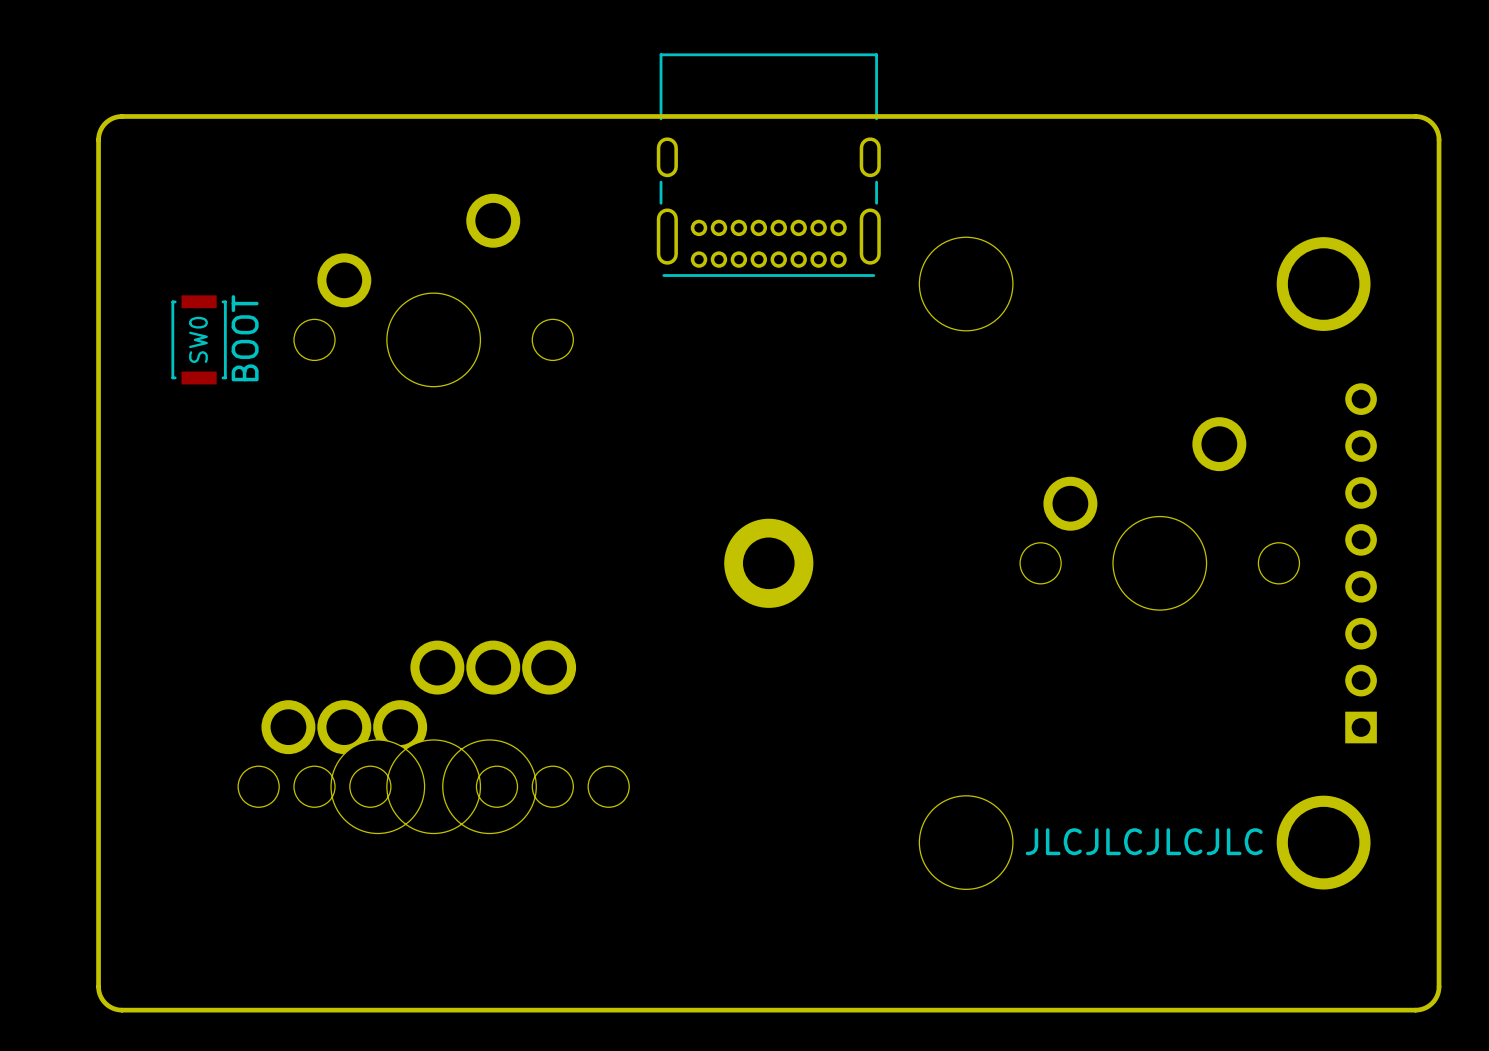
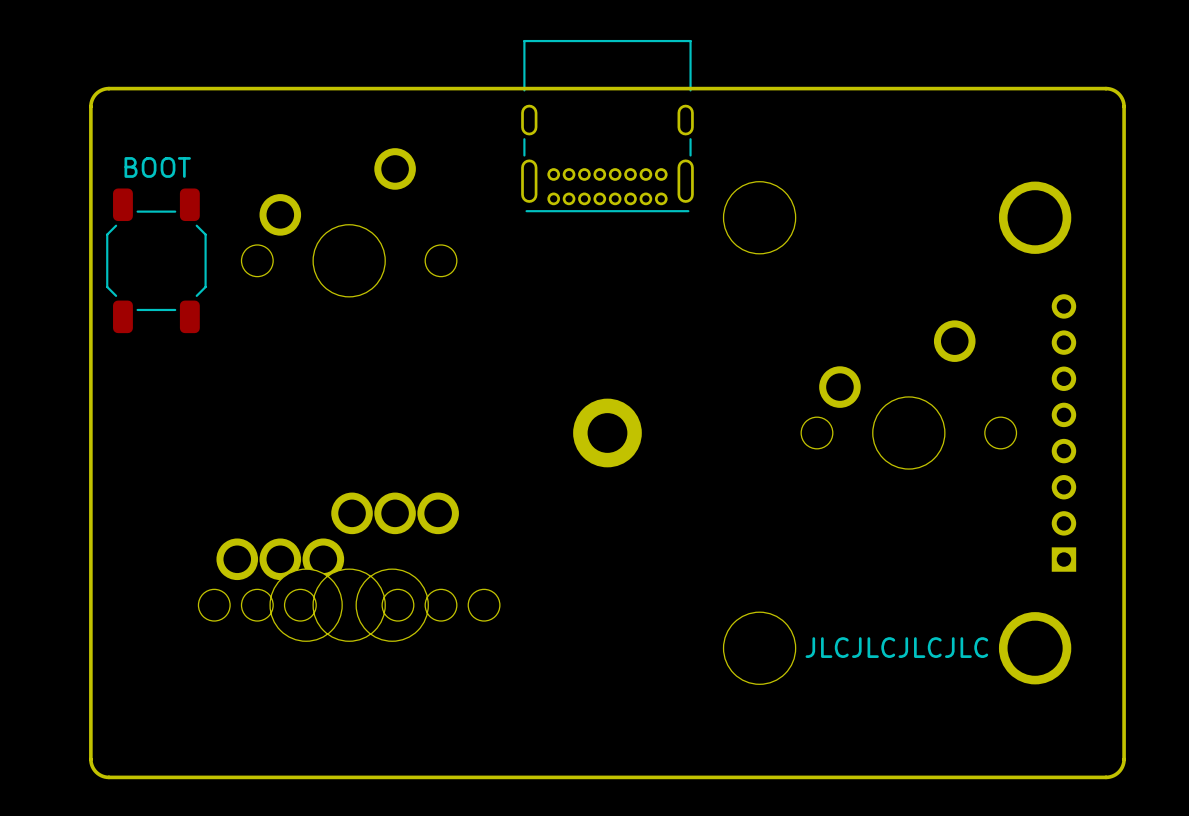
part: none -> BOOT (156, 260)
SW0: BOOT (199, 339) -> none

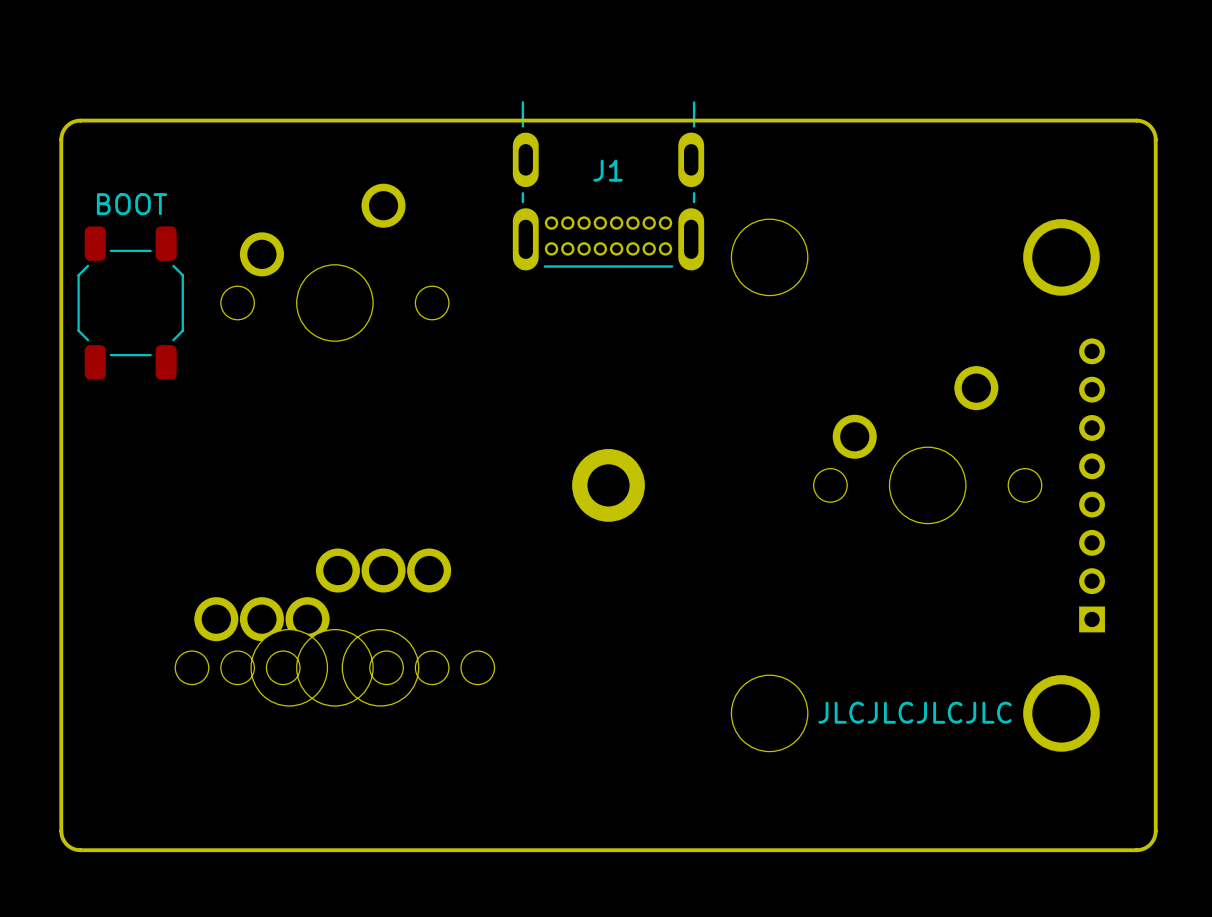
part: (607, 126) -> none
J1: none -> (608, 185)

